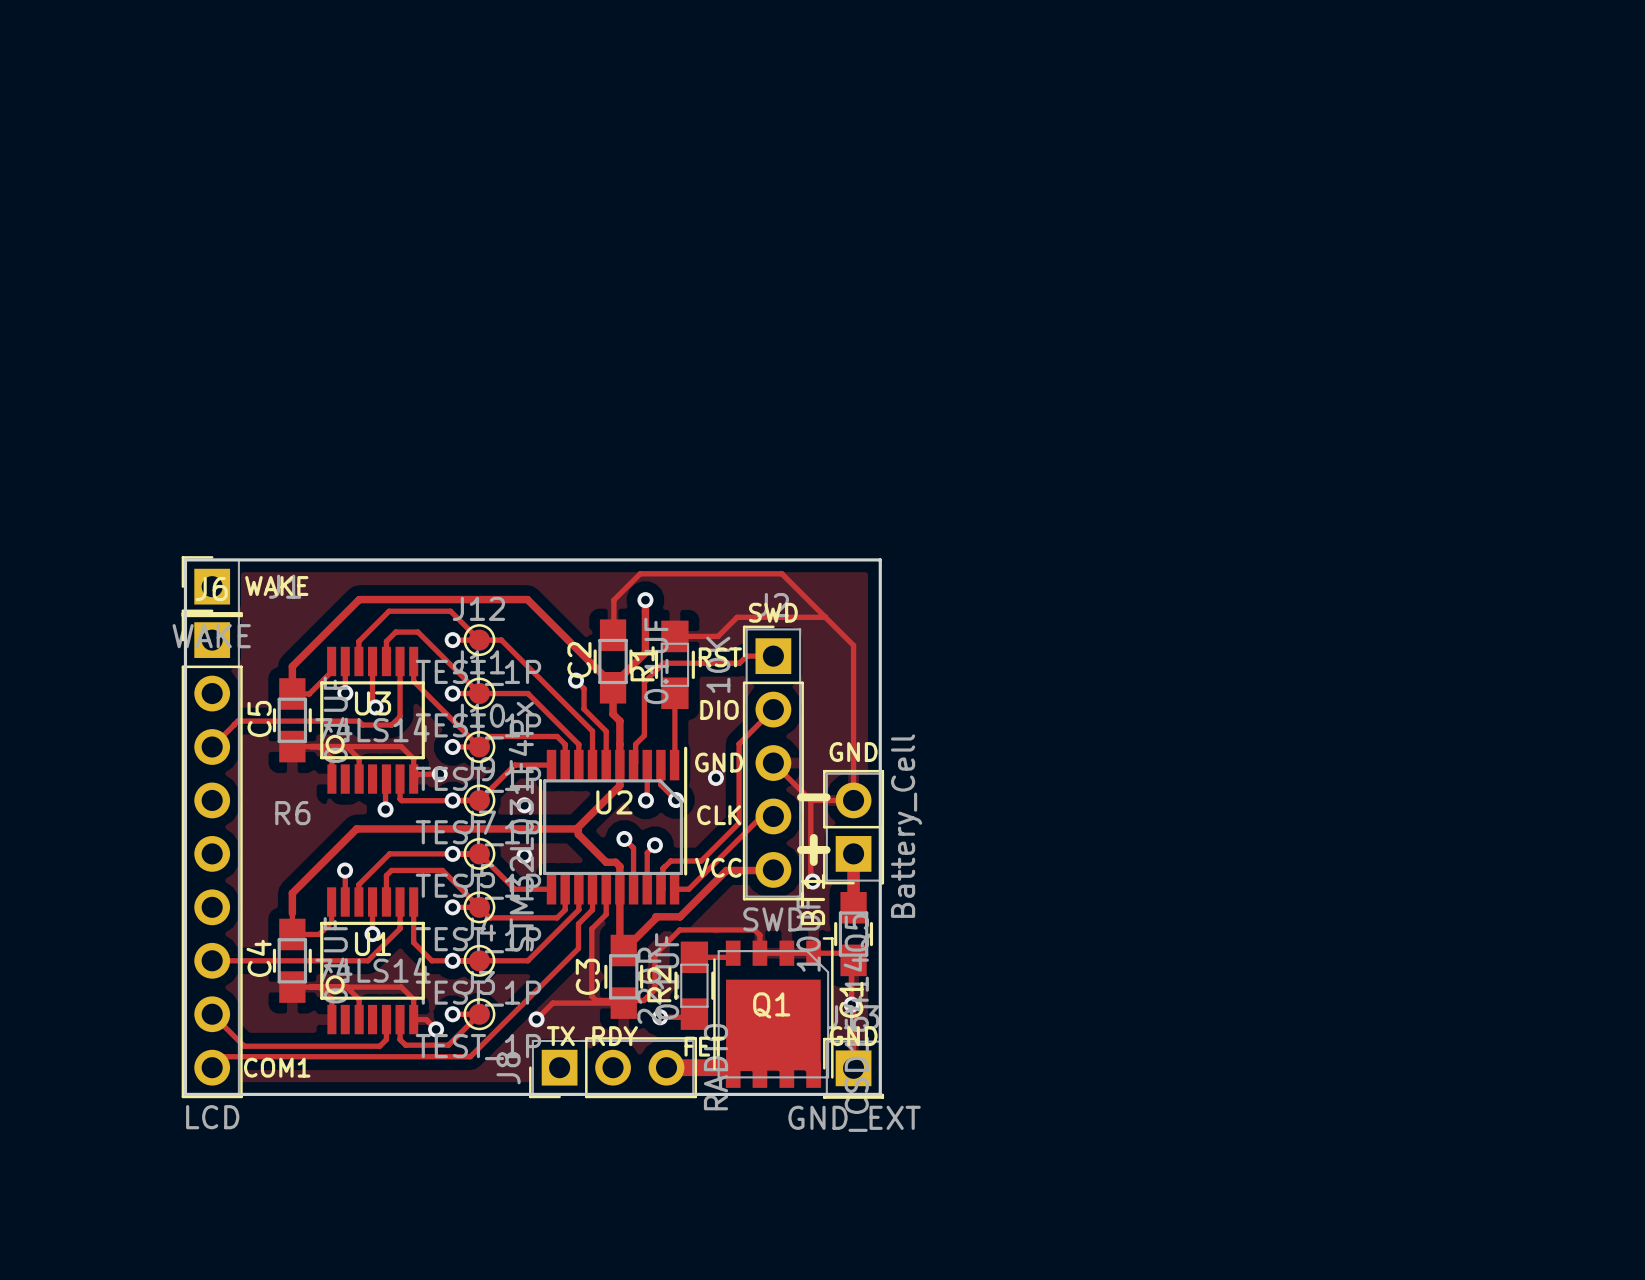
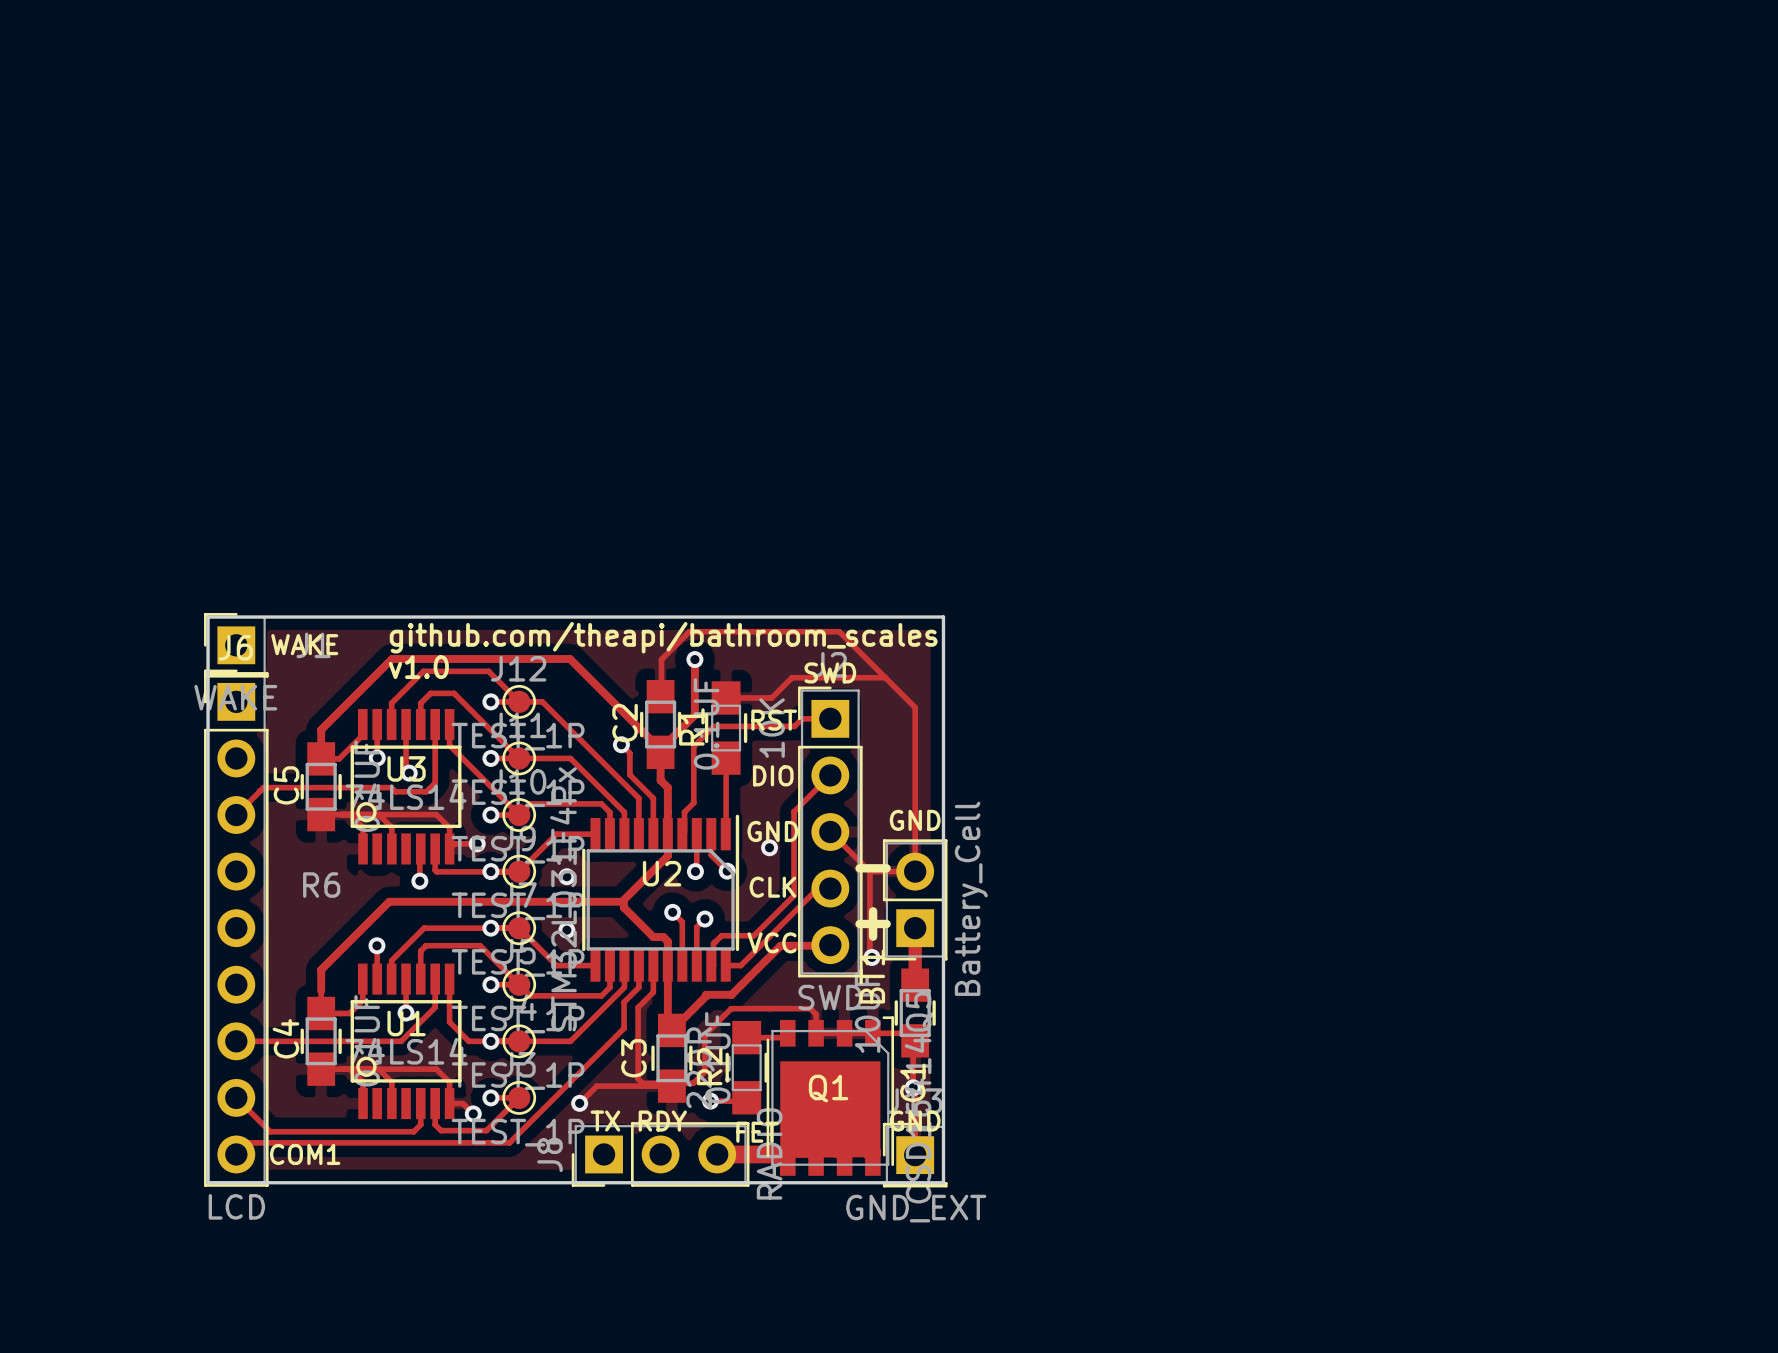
text: none -> github.com/theapi/bathroom_scales (663, 637)
text: none -> v1.0 (418, 667)

